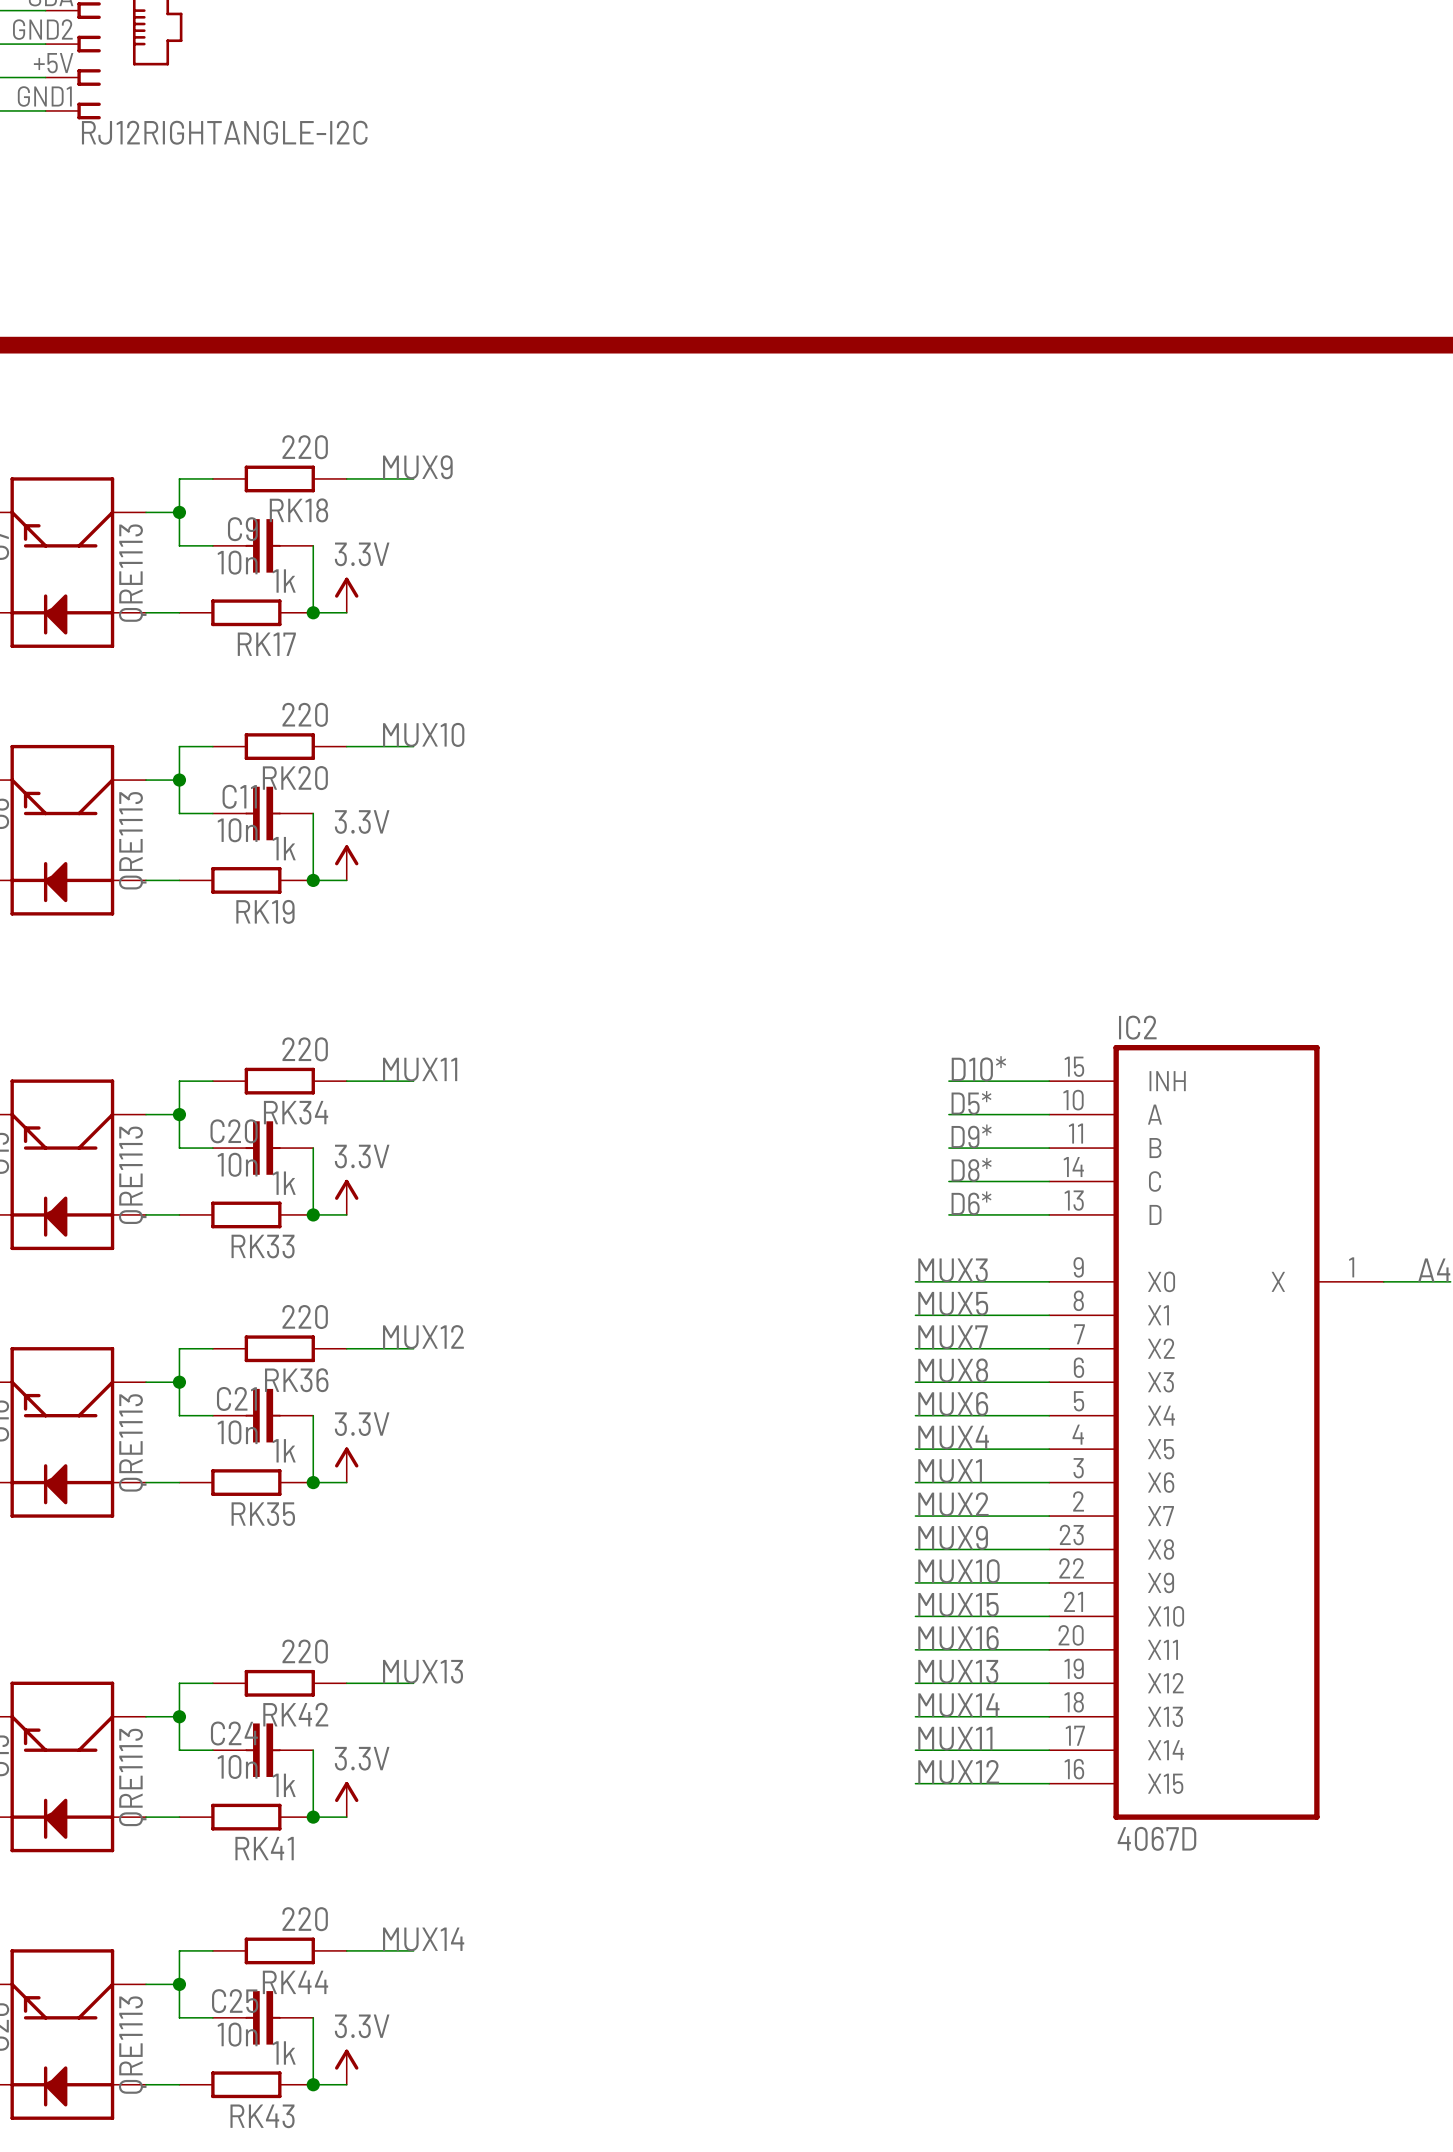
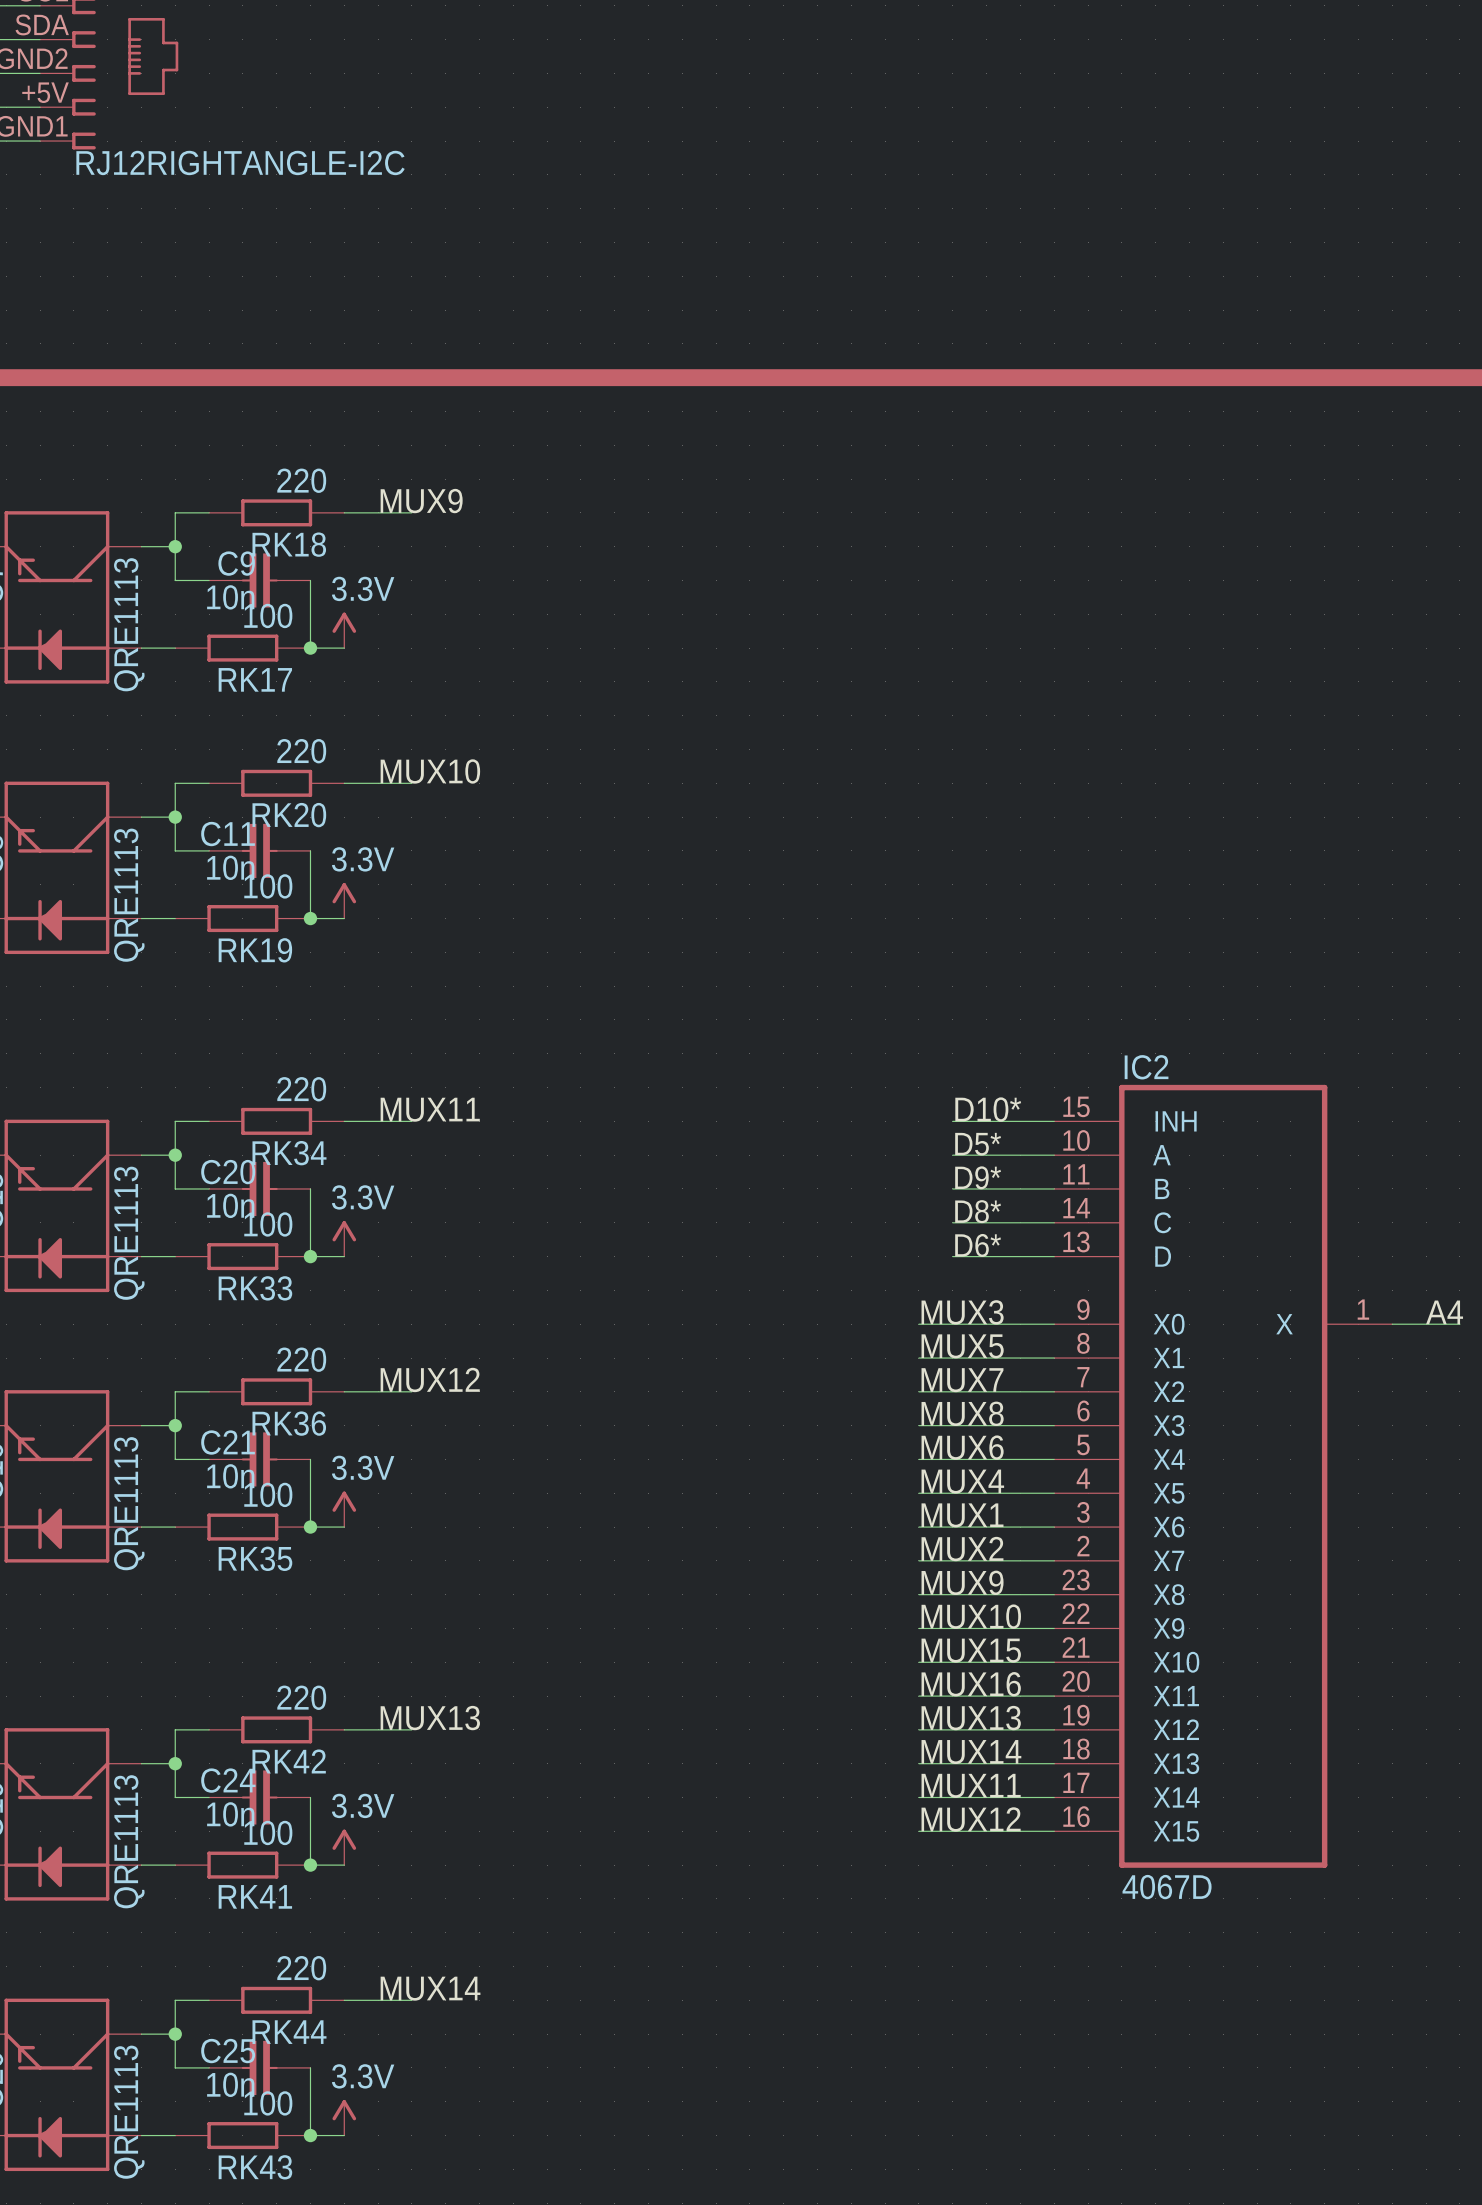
RK17 value: 1k (284, 581) -> 100 (268, 615)
RK19 value: 1k (284, 848) -> 100 (268, 886)
RK33 value: 1k (284, 1183) -> 100 (268, 1224)
RK35 value: 1k (284, 1450) -> 100 (268, 1494)
RK41 value: 1k (284, 1785) -> 100 (268, 1832)
RK43 value: 1k (284, 2052) -> 100 (268, 2103)

